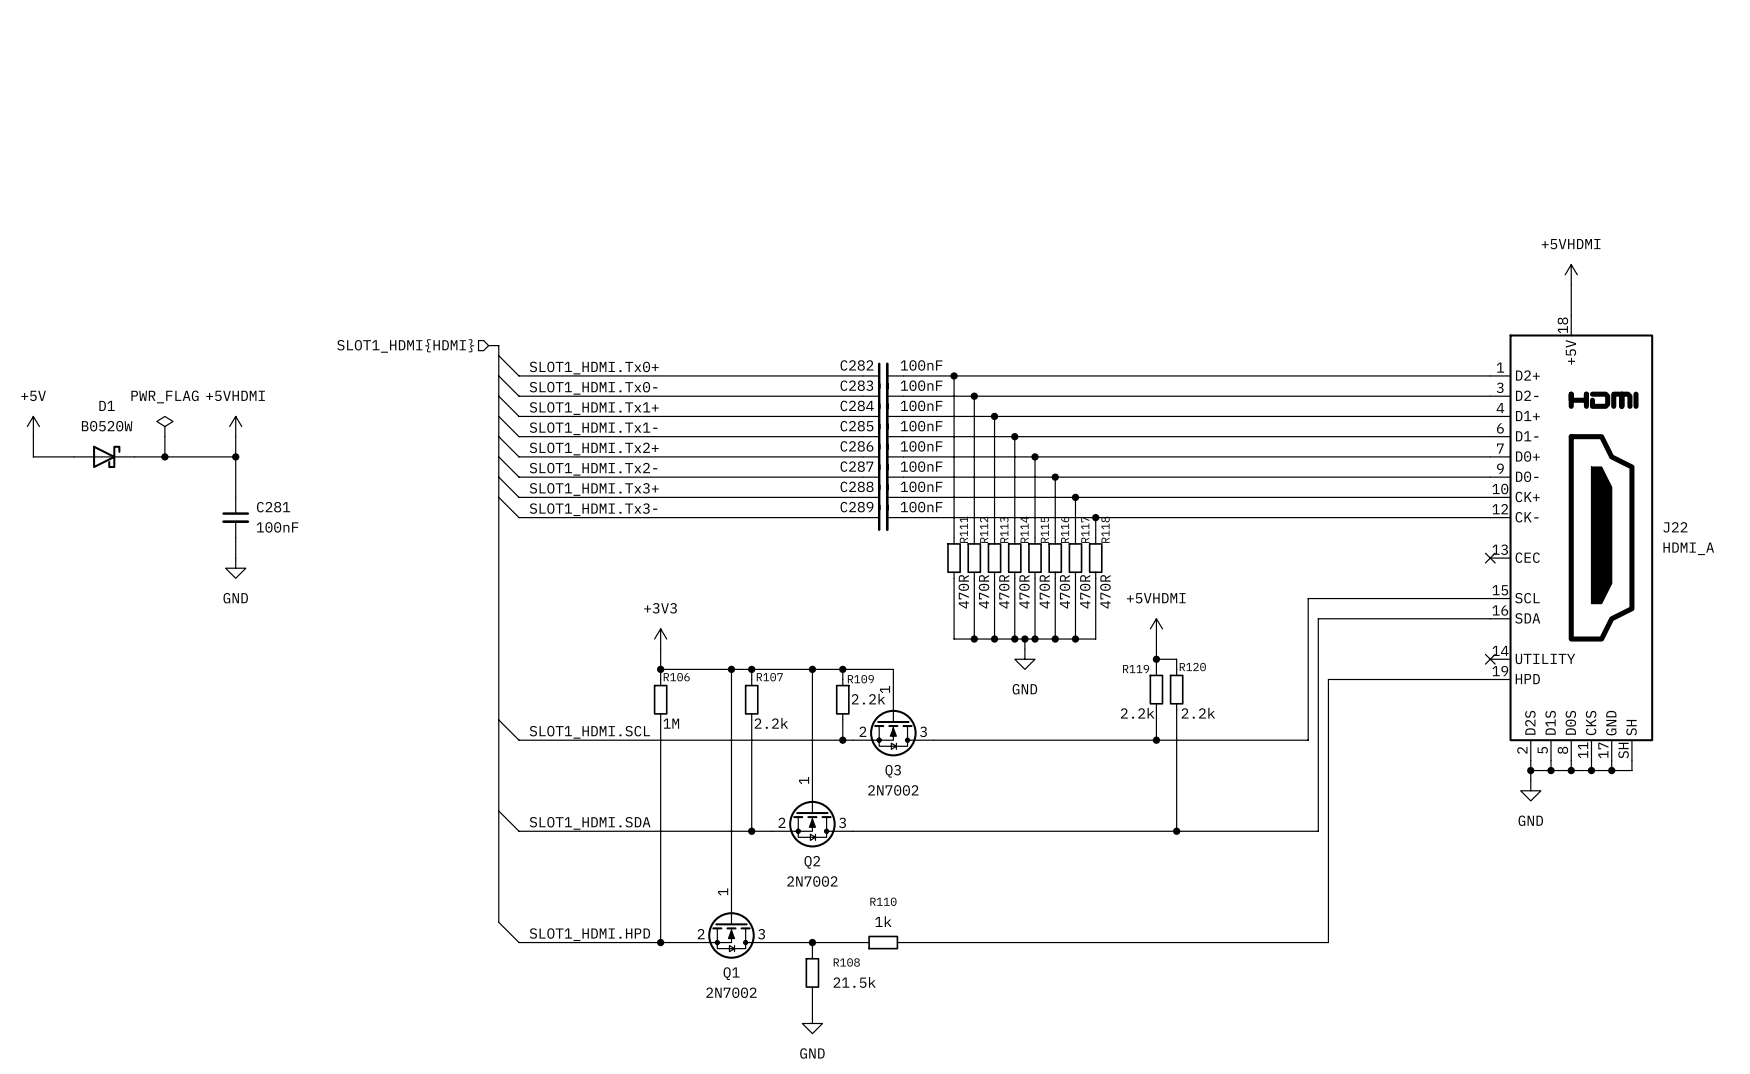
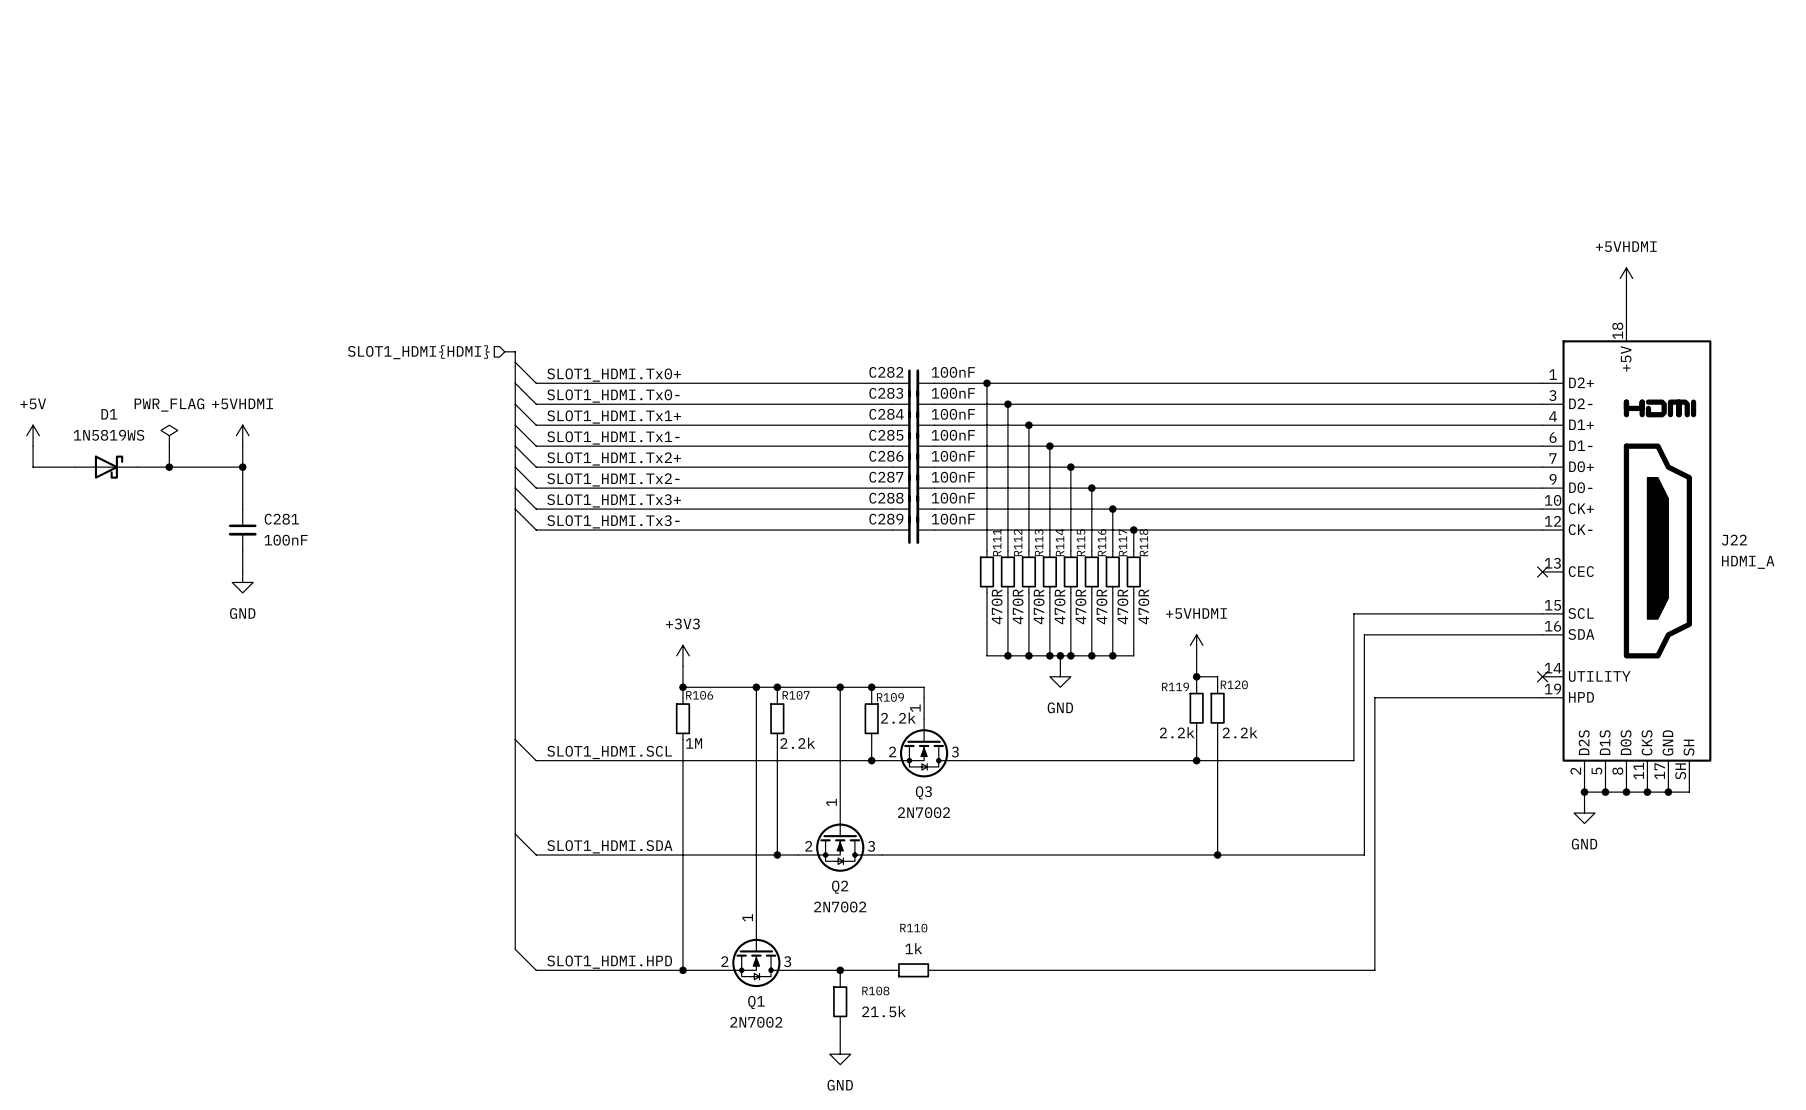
D1 value: B0520W (107, 426) -> 1N5819WS (109, 435)

